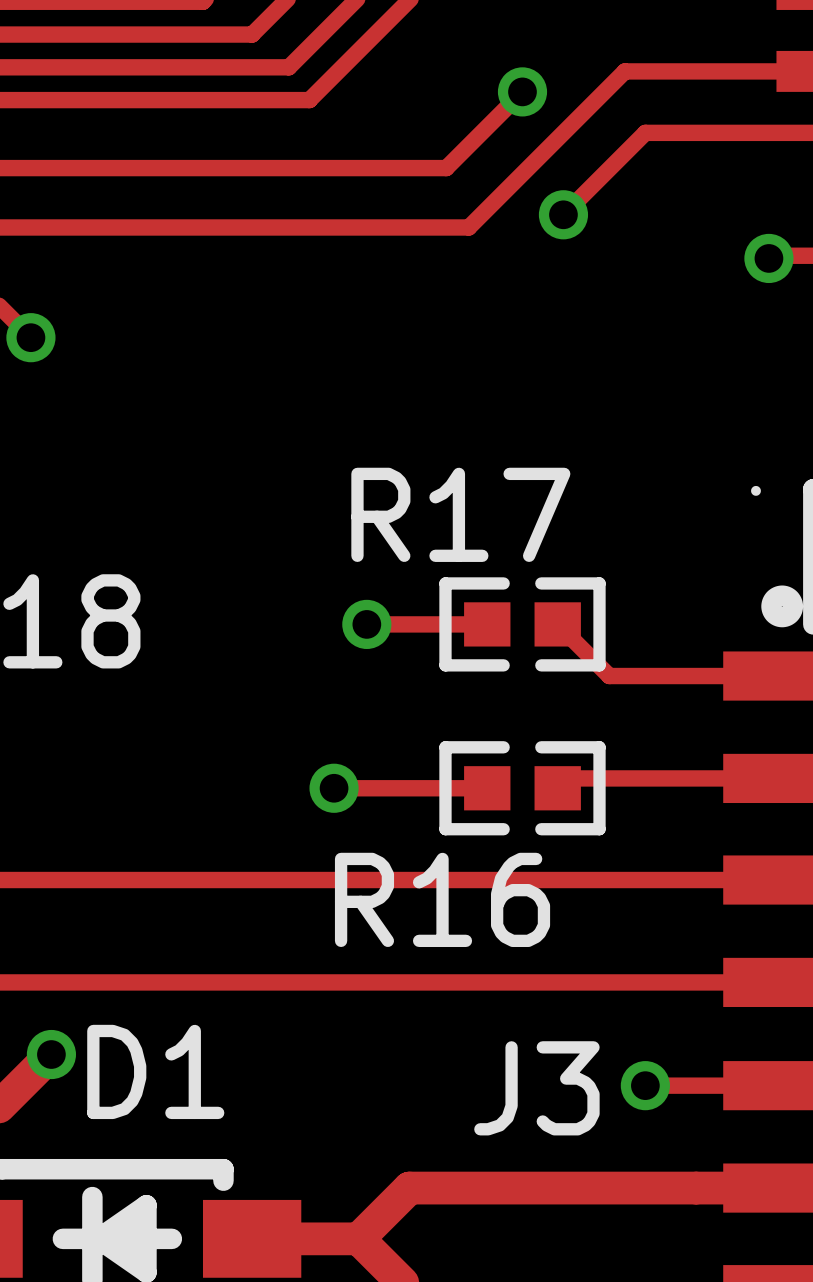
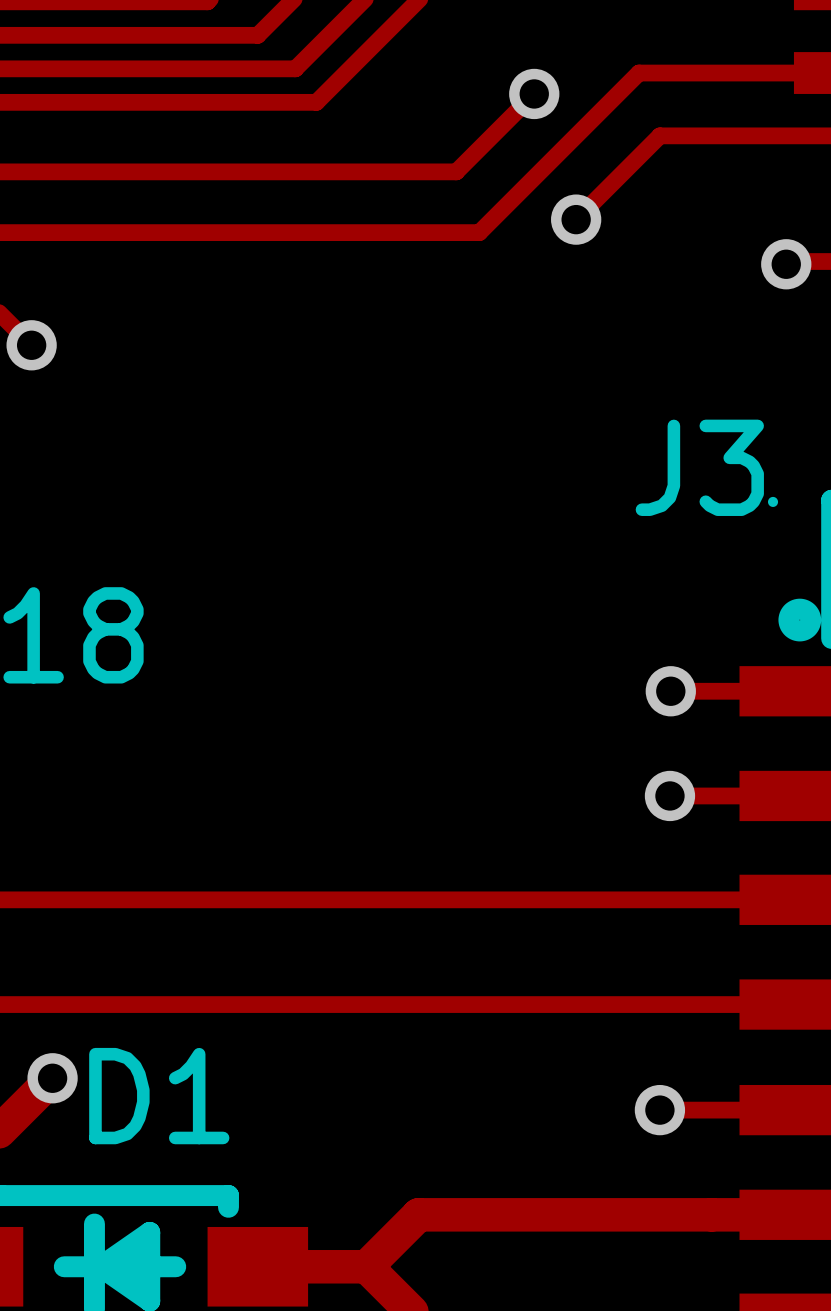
track: (366, 624) (487, 624) -> none
via: (366, 624) -> none
R17: (522, 624) -> none
track: (557, 624) (609, 676) (656, 676) -> none
via: none -> (670, 691)
track: (655, 778) (567, 778) (557, 788) -> none
via: none -> (669, 795)
track: (334, 788) (487, 788) -> none
via: (334, 788) -> none
R16: (522, 788) -> none
J3 name position: J3 (536, 1088) -> J3 (699, 467)

